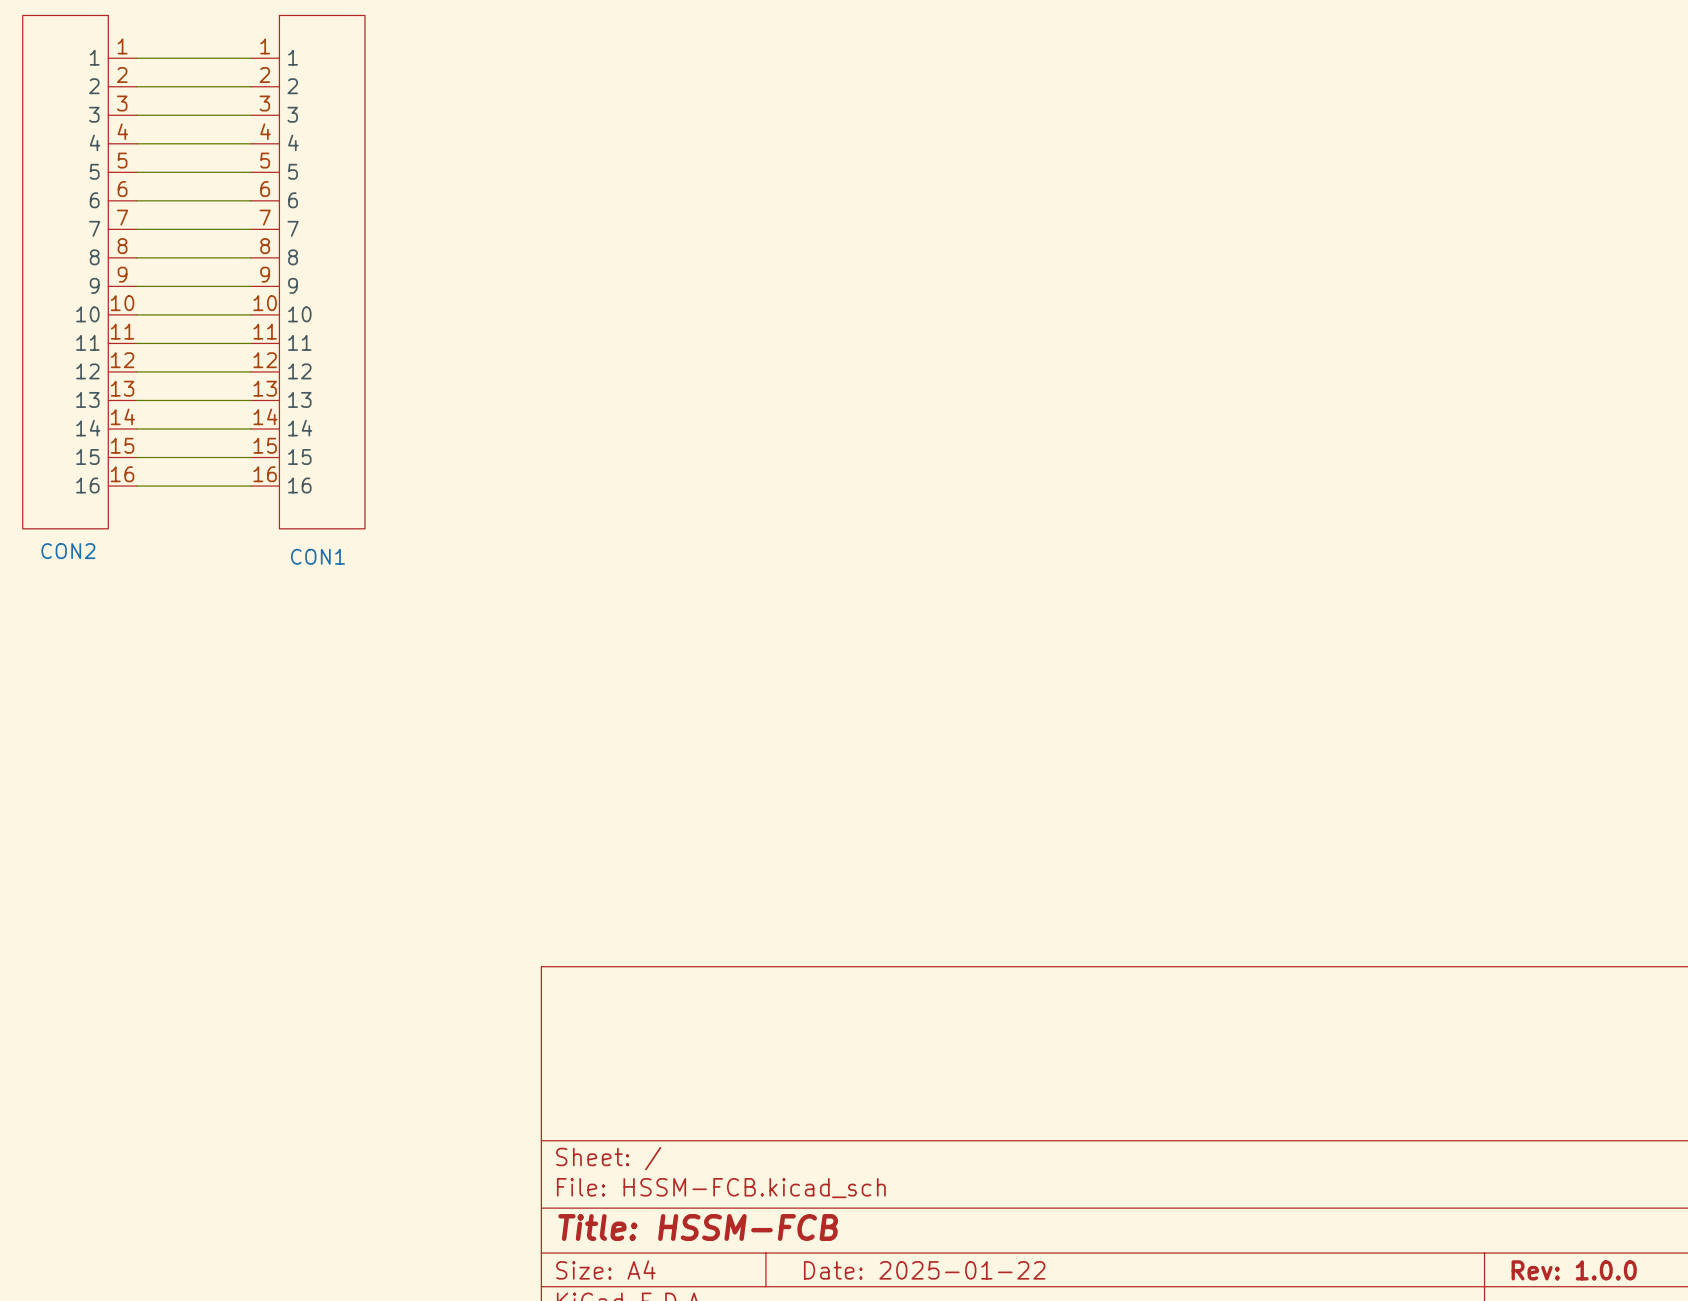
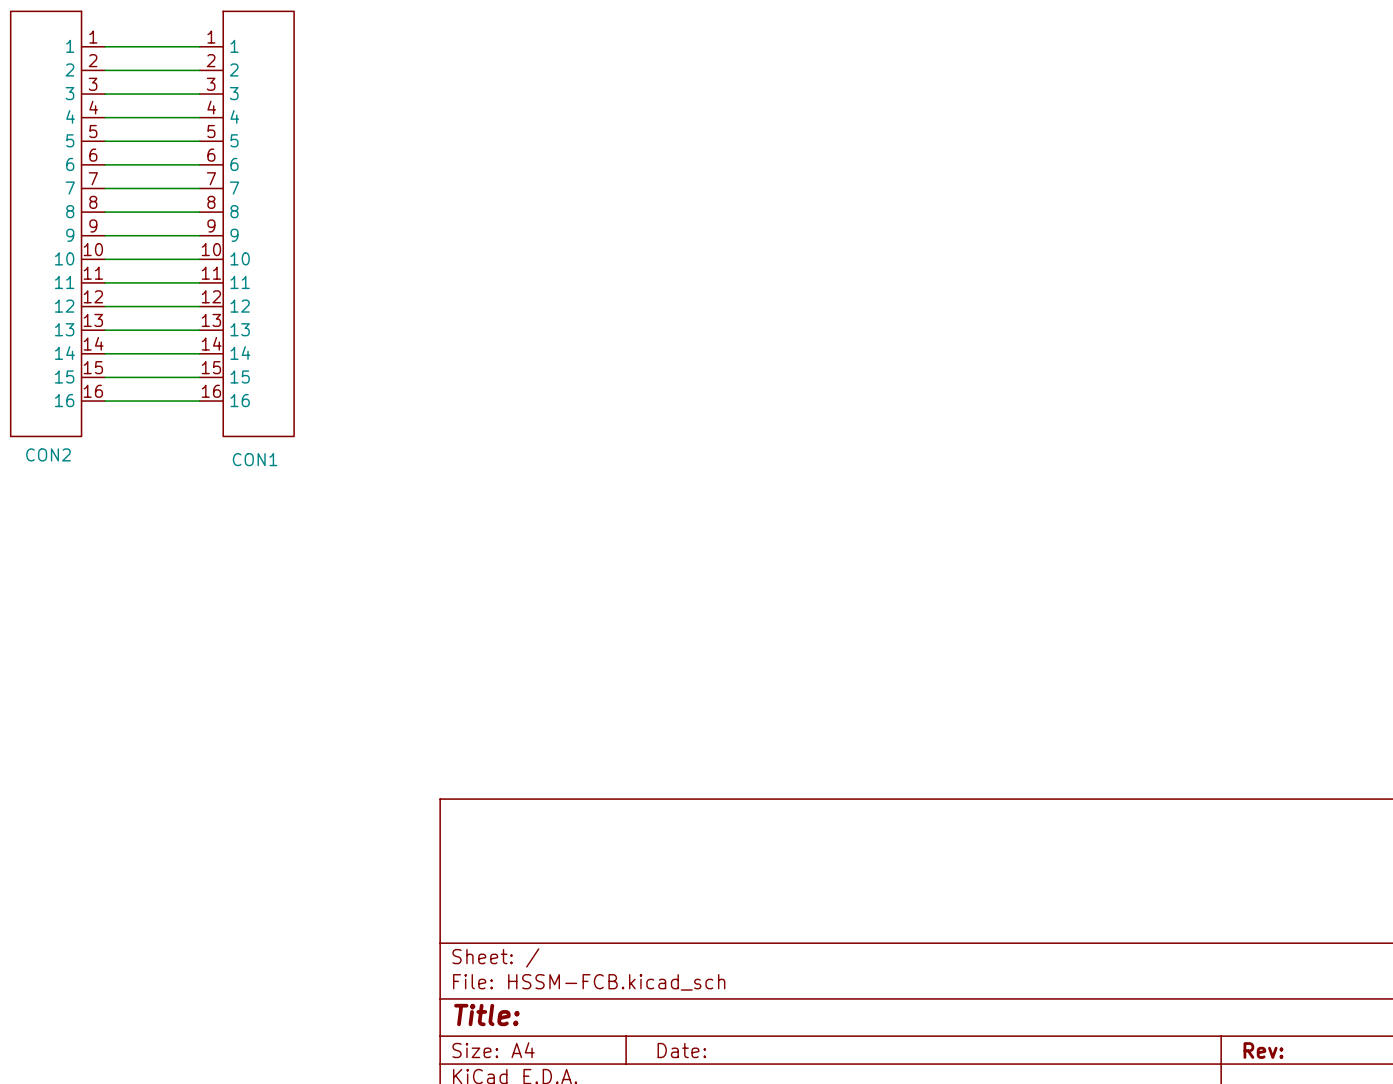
title block: Title: HSSM-FCB (698, 1227) -> Title: (486, 1015)
title block: Date: 2025-01-22 (924, 1270) -> Date: (681, 1050)
title block: Rev: 1.0.0 (1574, 1270) -> Rev: (1263, 1050)

